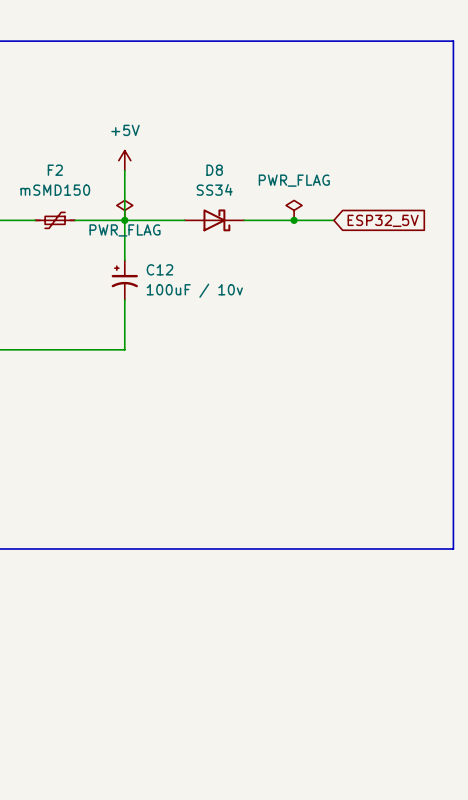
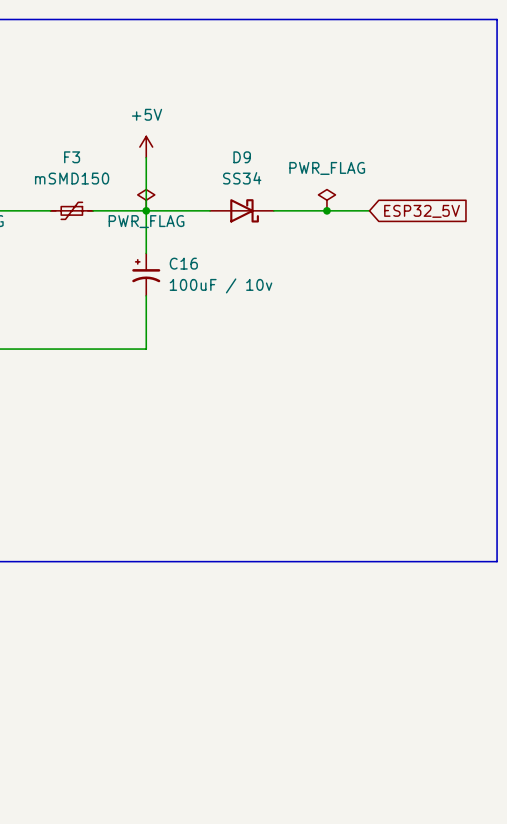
F2 name: F2 (55, 170) -> F3 (72, 157)
D8 name: D8 (214, 170) -> D9 (242, 157)
C12 name: C12 (159, 269) -> C16 (183, 263)

